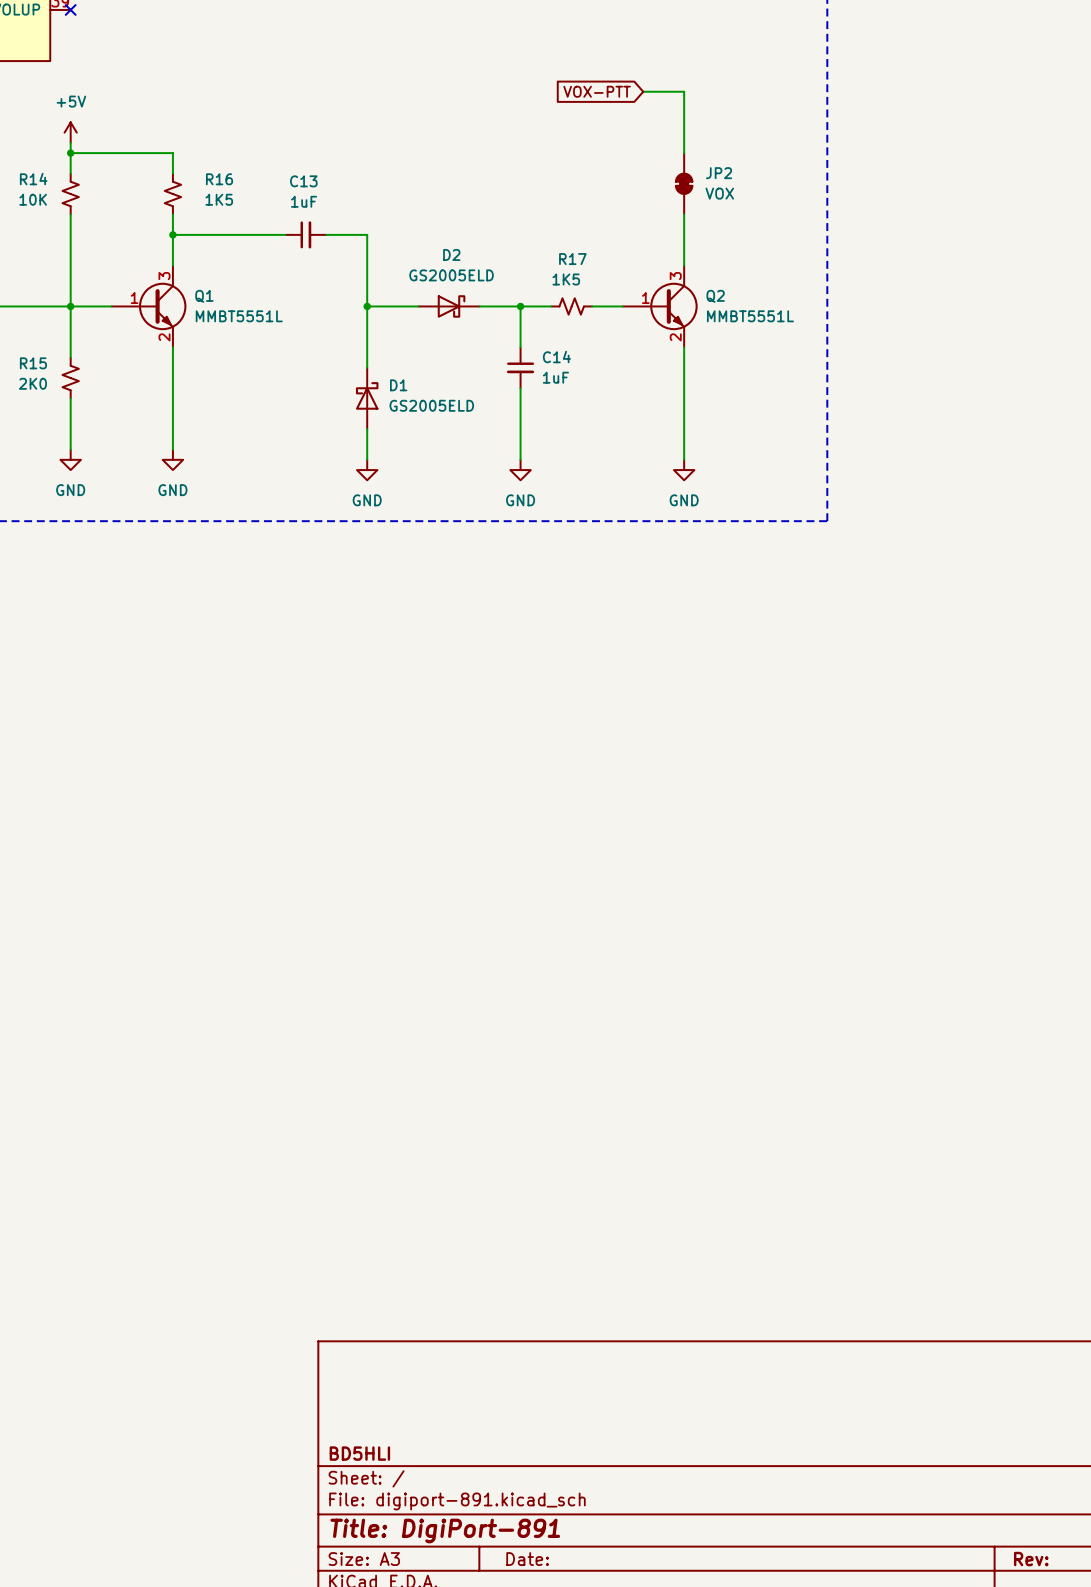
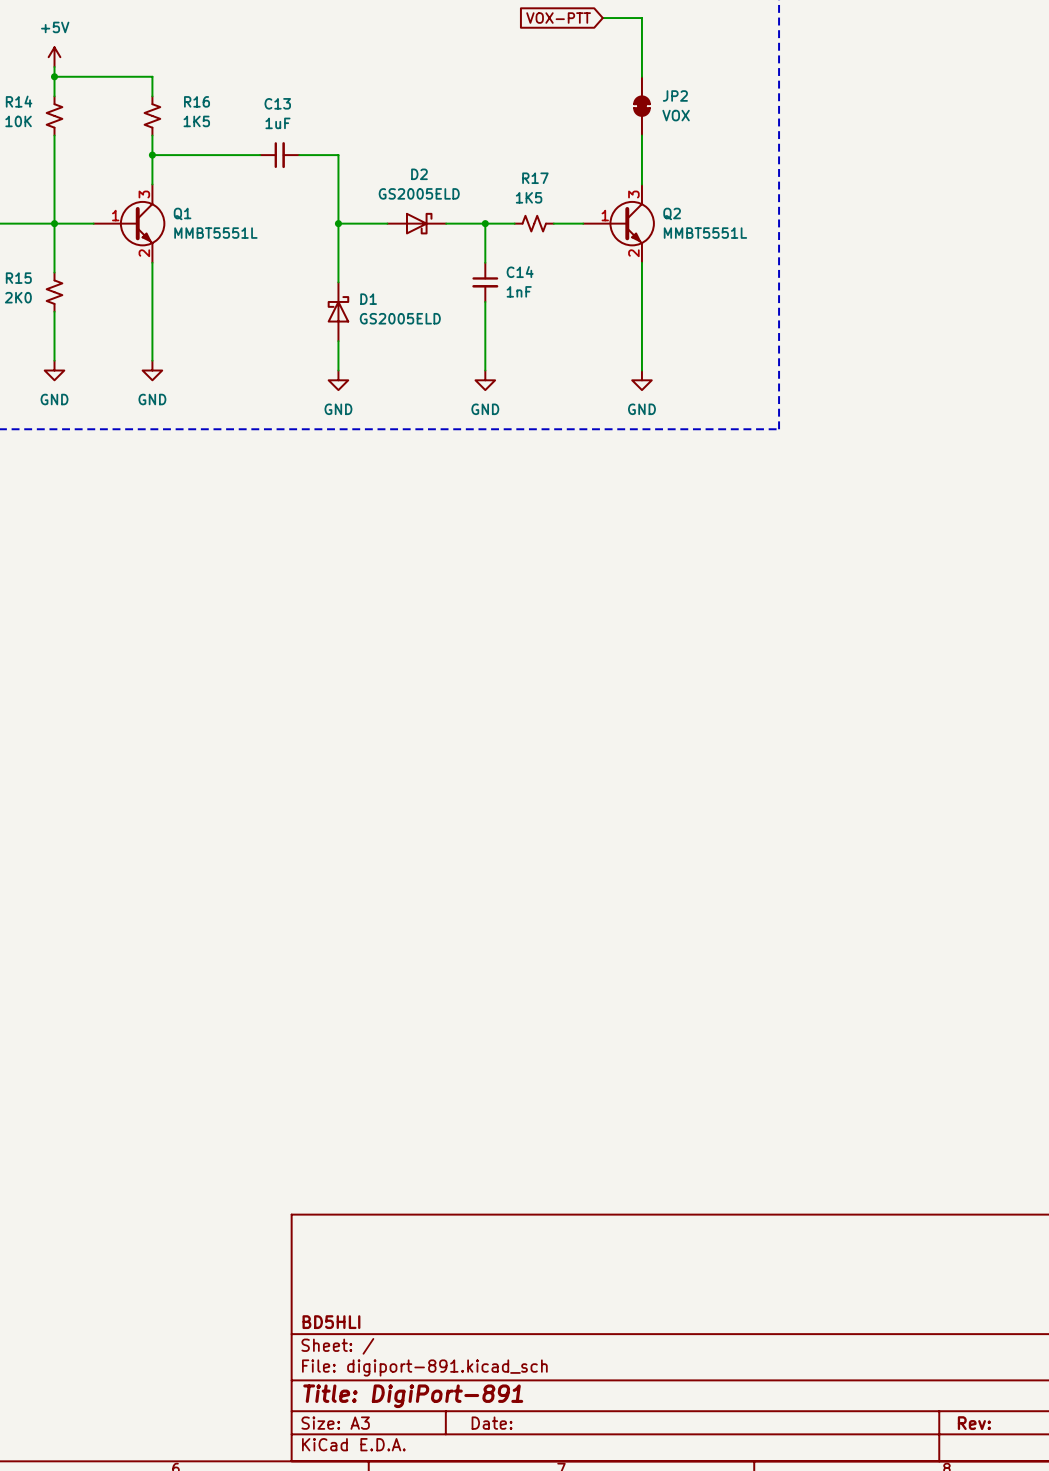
C14 value: 1uF (555, 377) -> 1nF (519, 291)

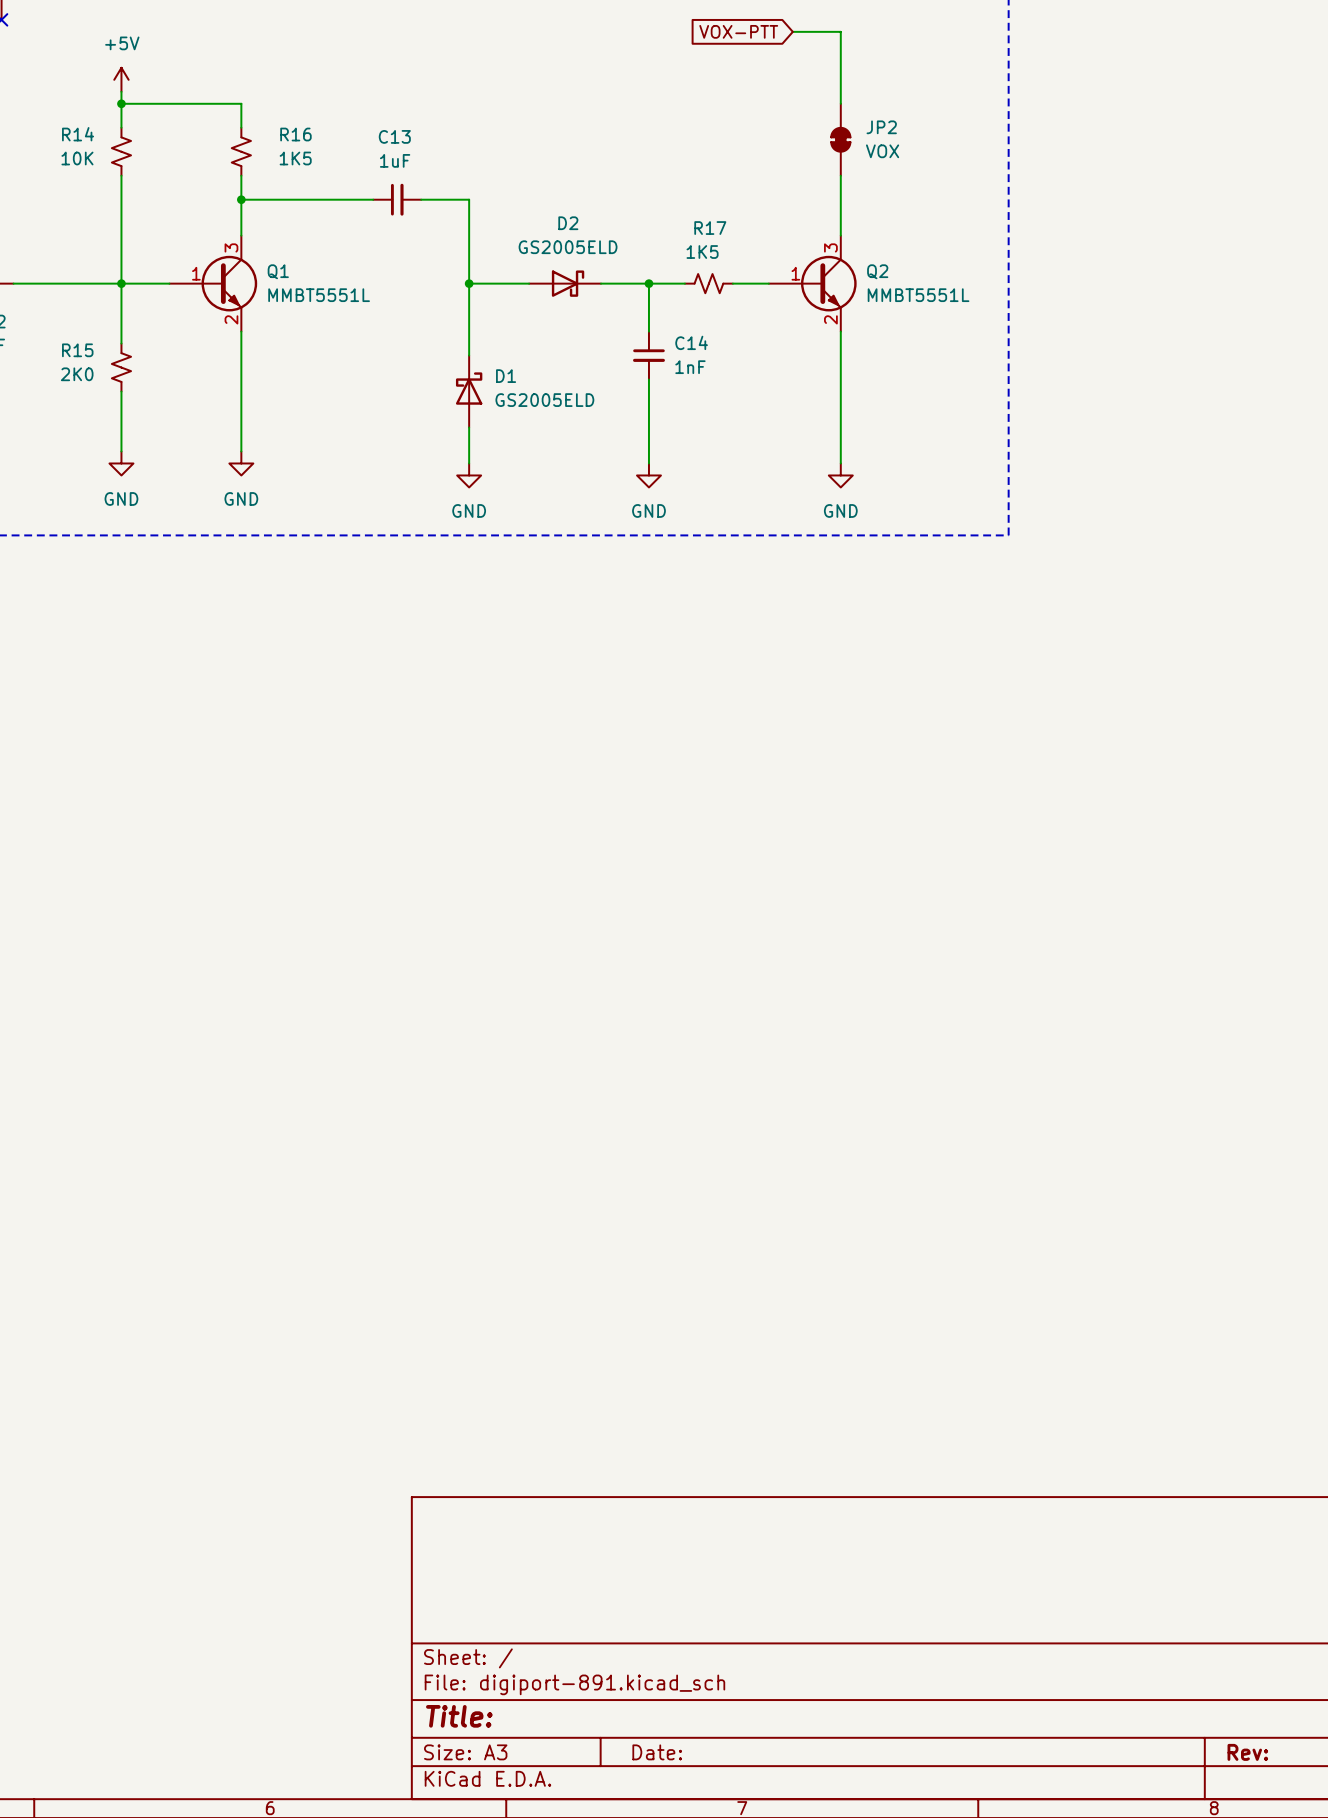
title block: BD5HLI (331, 1322) -> none
title block: Title: DigiPort-891 (413, 1396) -> Title: (459, 1716)

